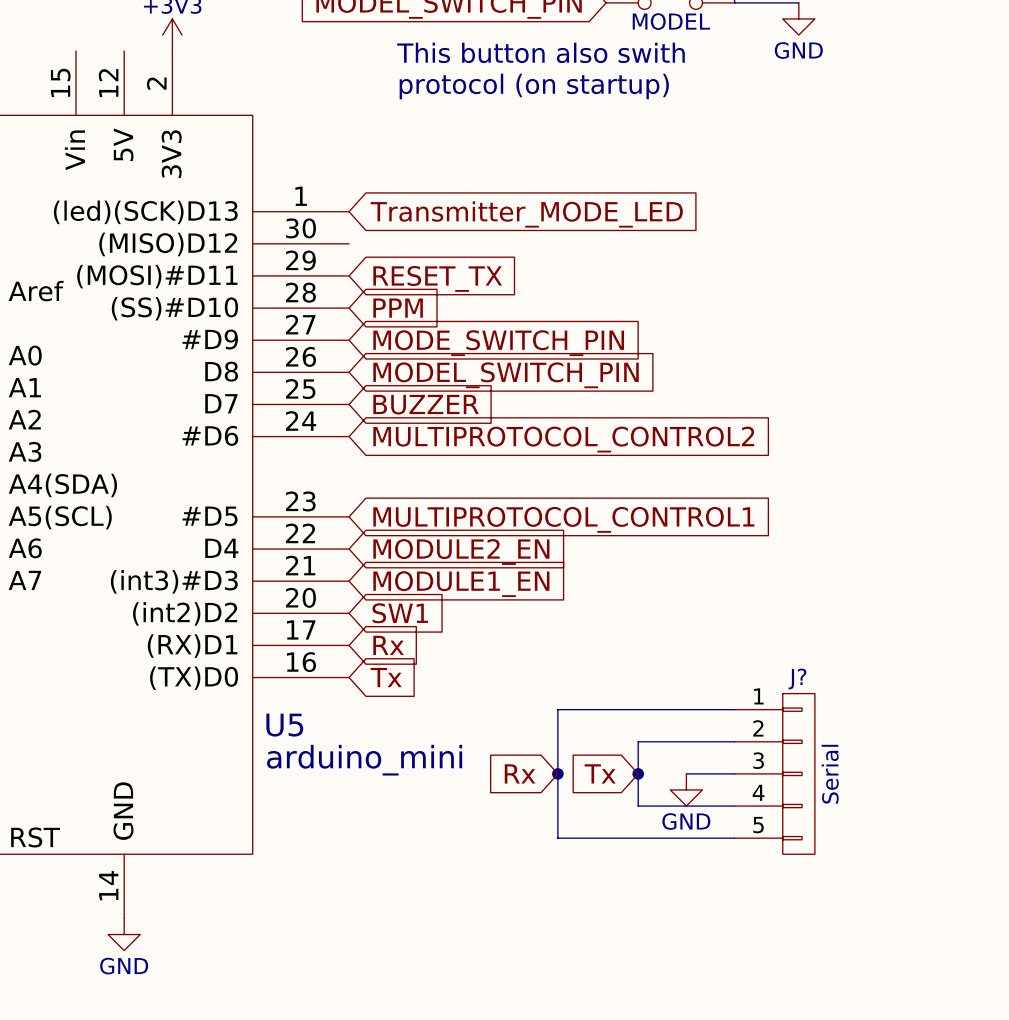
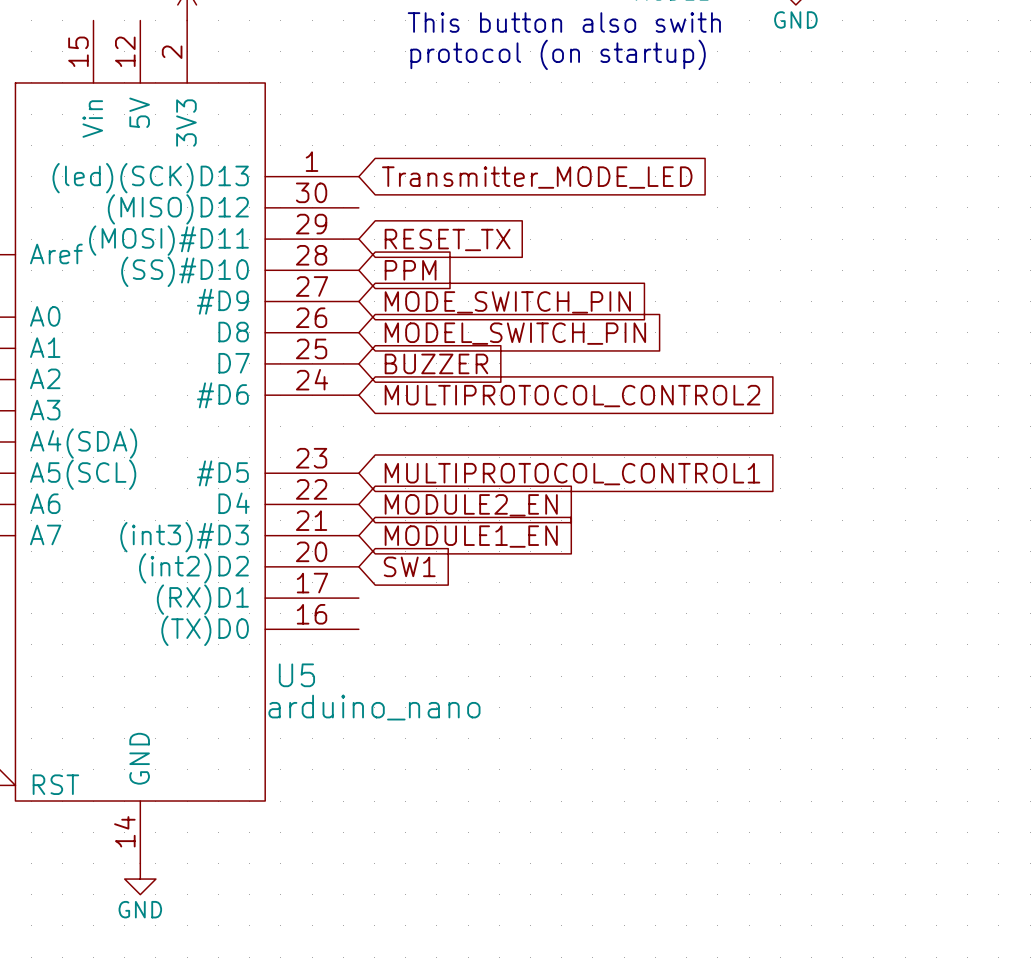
global label: Rx (388, 645) -> none
global label: Tx (386, 677) -> none
wire: (734, 709) (557, 709) (557, 838) (734, 838) -> none
wire: (734, 741) (638, 741) (638, 806) (734, 806) -> none
U5 value: arduino_mini (364, 760) -> arduino_nano (374, 707)
global label: Rx (520, 773) -> none
junction: (557, 773) -> none
global label: Tx (600, 773) -> none
junction: (638, 773) -> none
wire: (686, 773) (734, 773) -> none
J?: Serial (774, 773) -> none
power symbol: GND (686, 789) -> none

